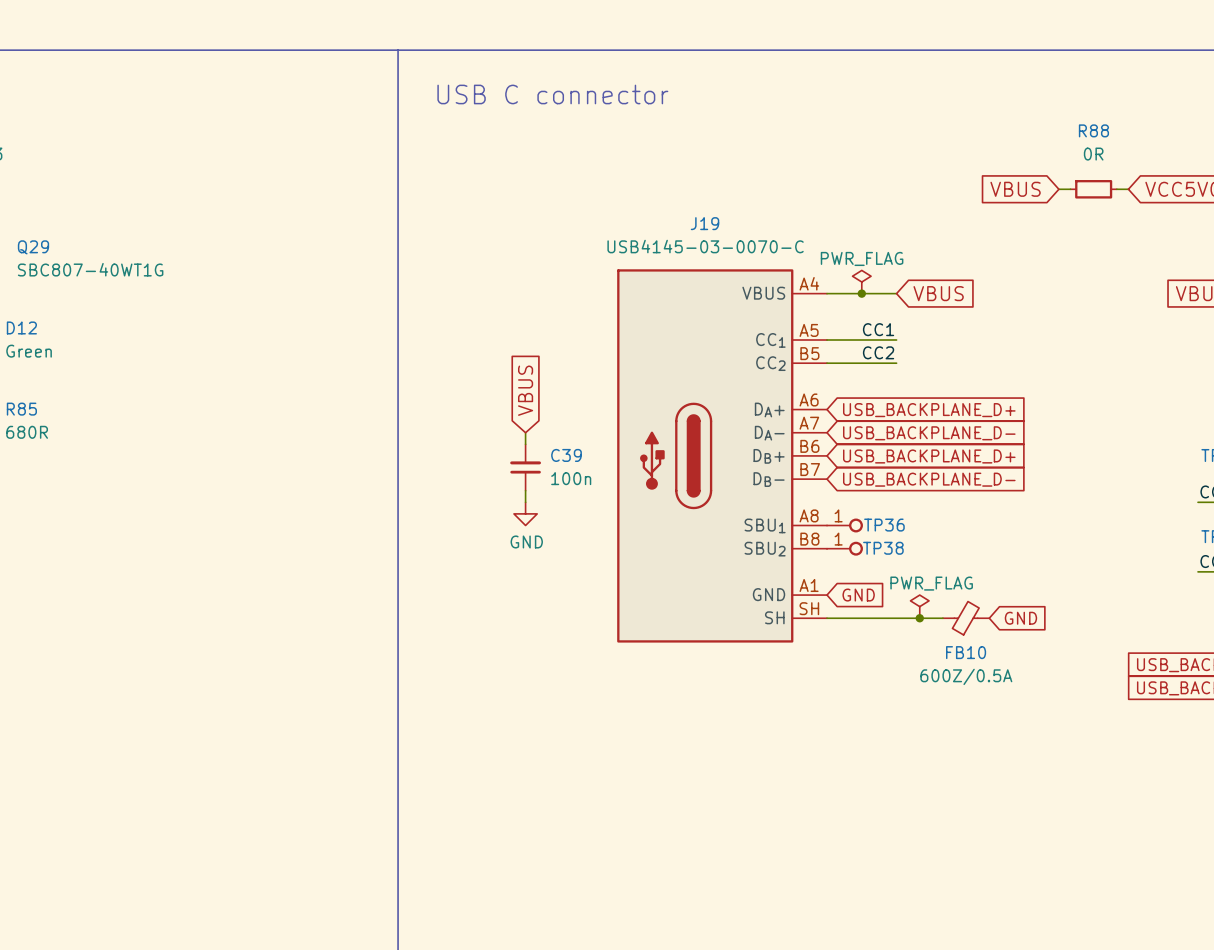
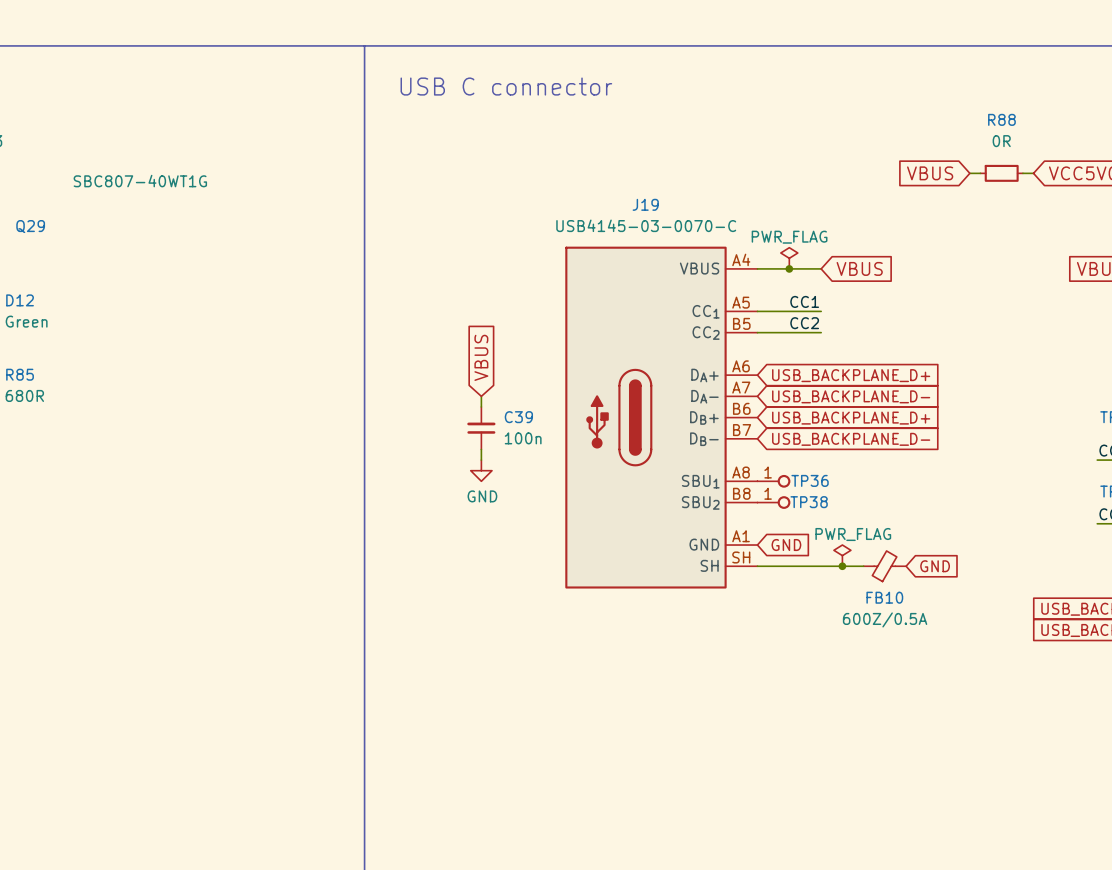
Q29 text position: SBC807-40WT1G (90, 269) -> SBC807-40WT1G (140, 181)

